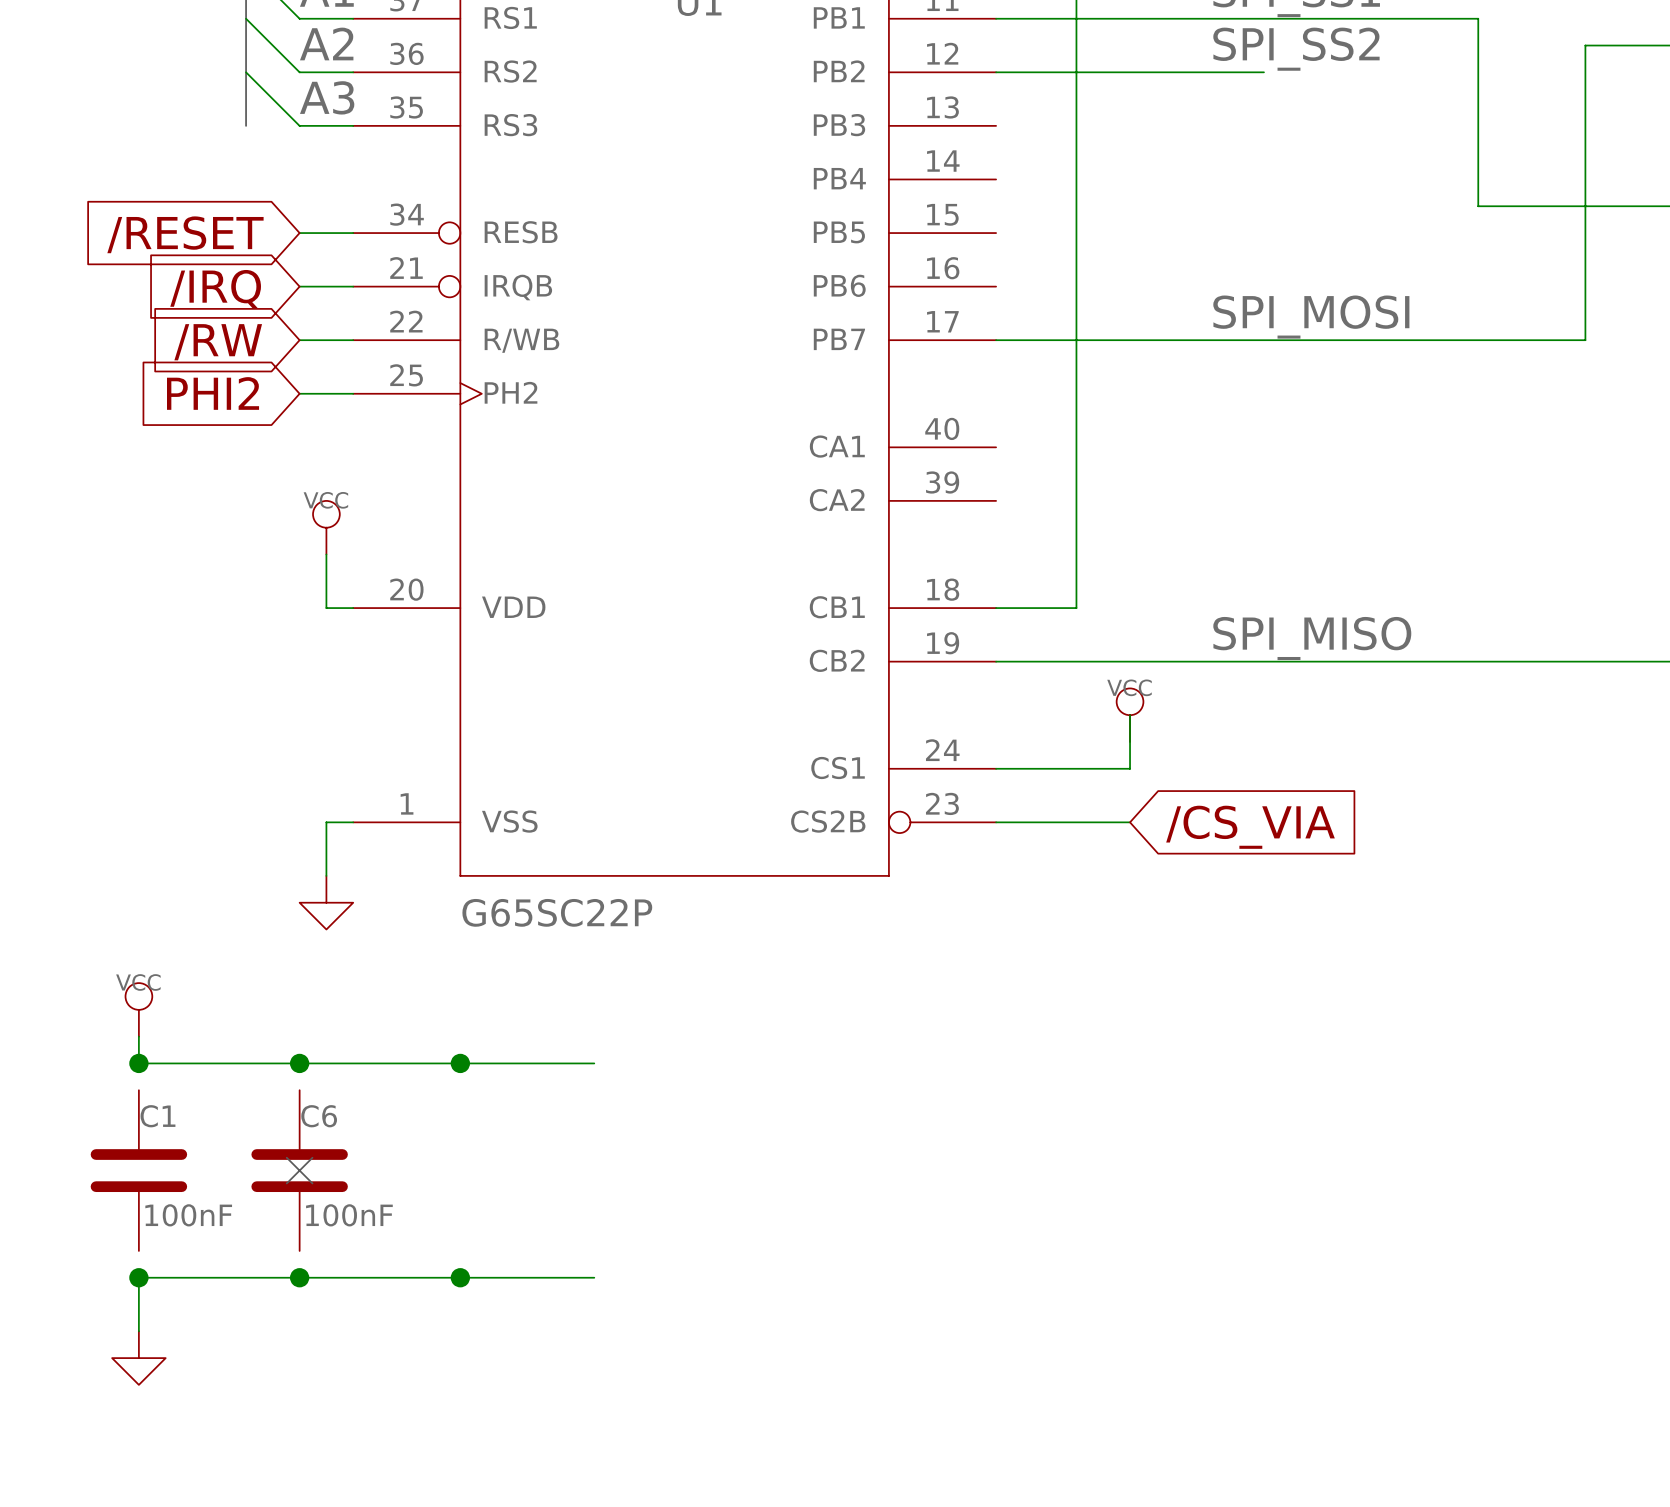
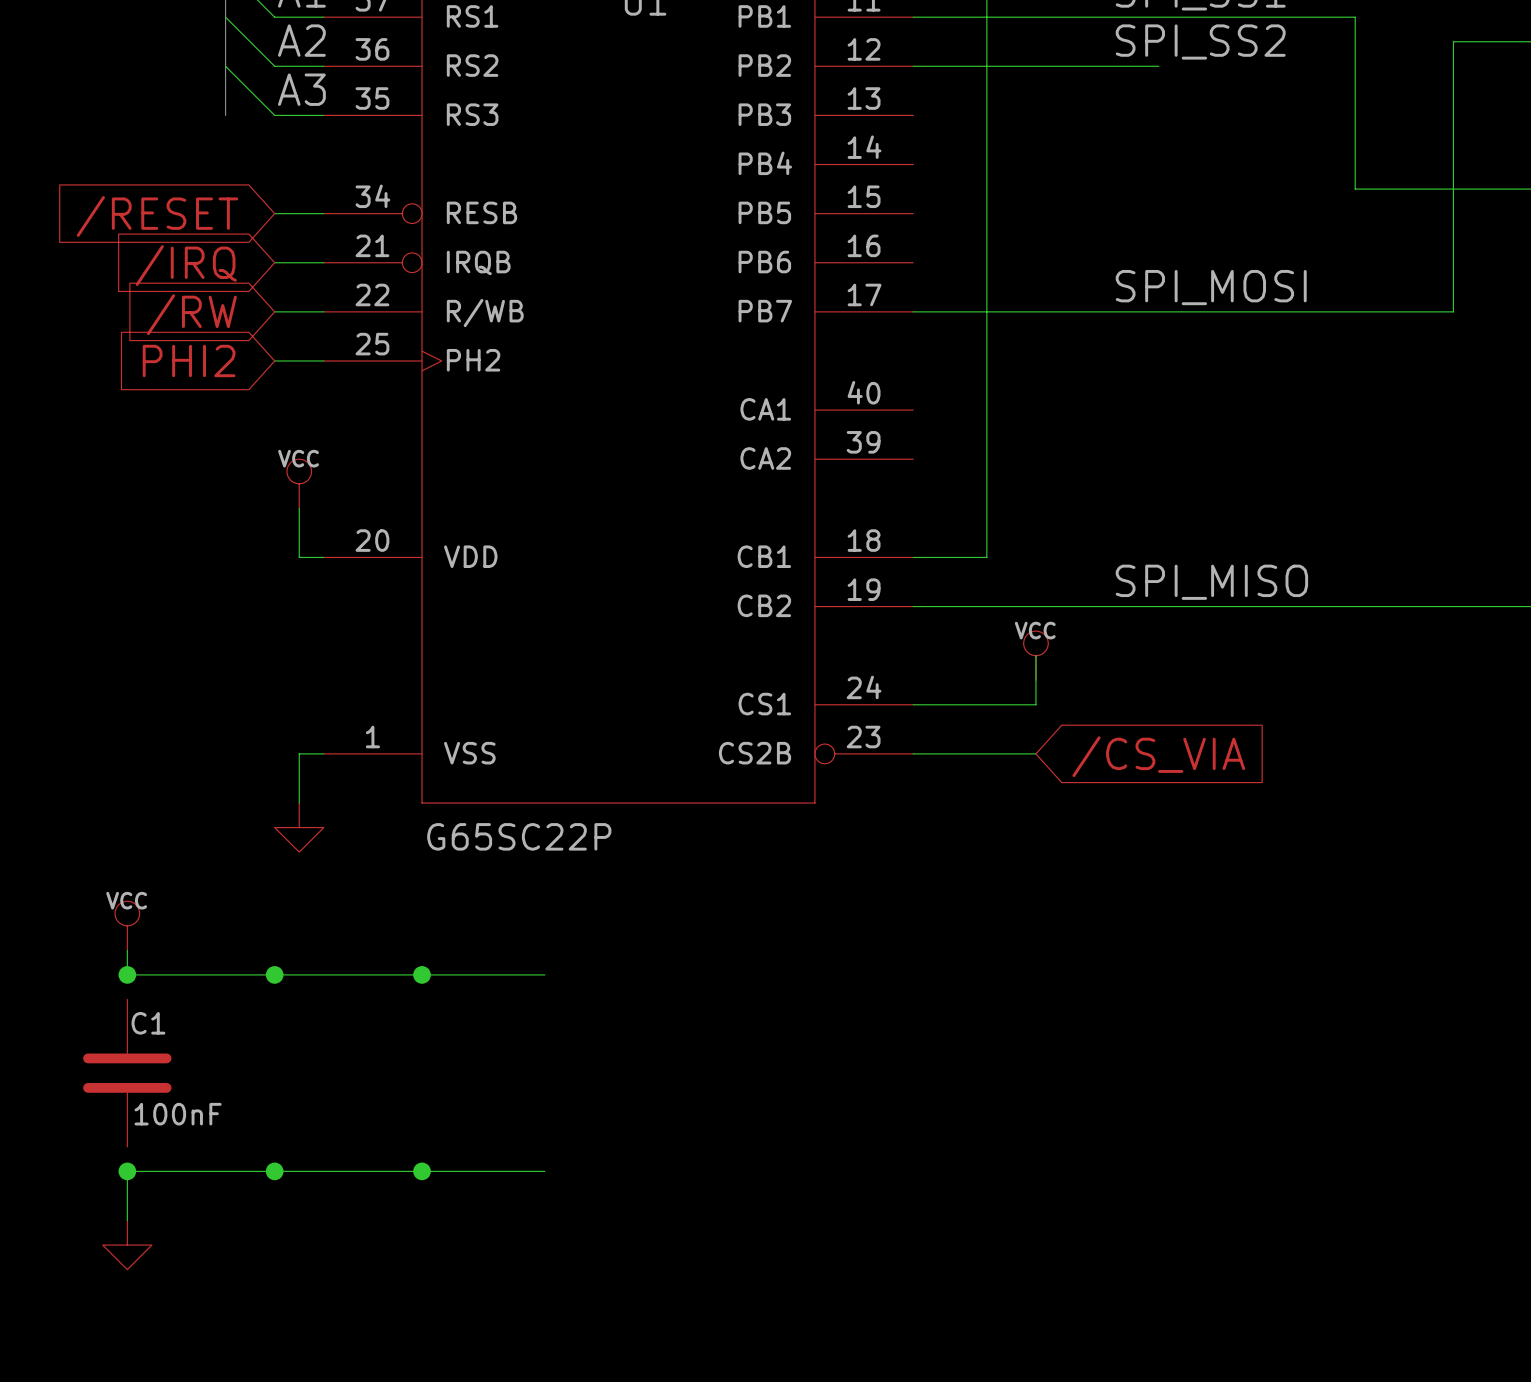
C6: 100nF (299, 1170) -> none
no-connect mark: (299, 1170) -> none

